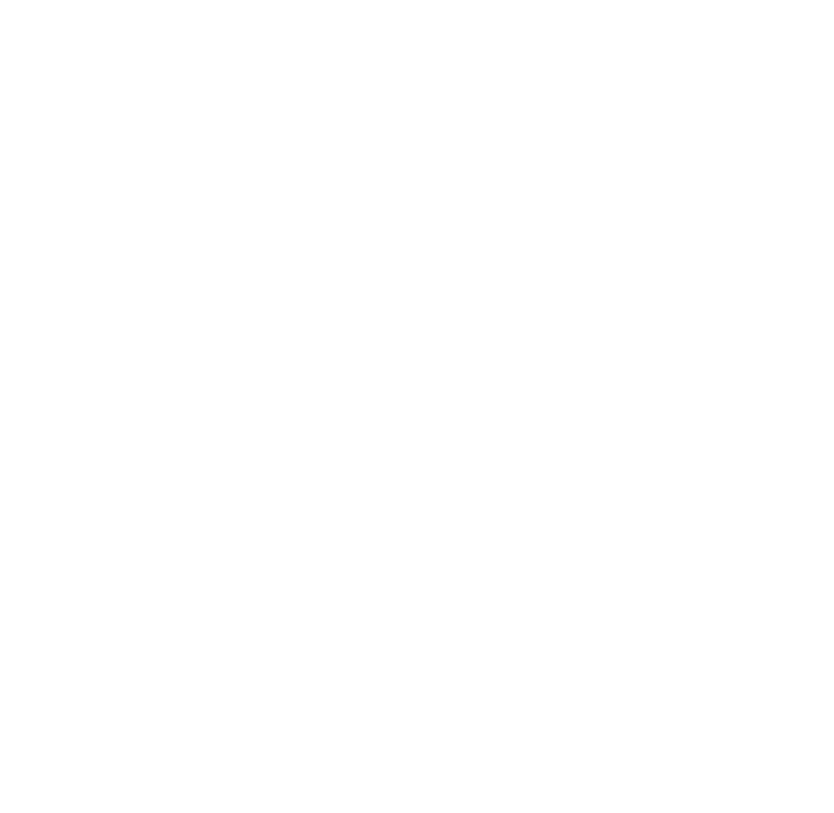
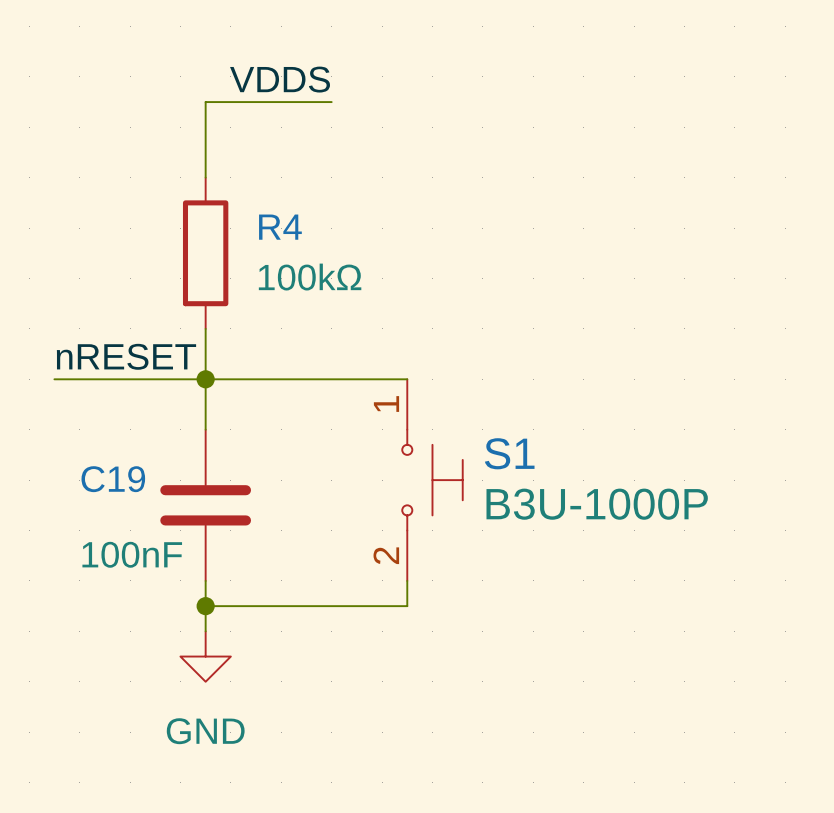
label: none -> VDDS (280, 79)
wire: none -> (331, 102) (205, 102) (205, 177)
R4: none -> 100kΩ (205, 253)
wire: none -> (205, 328) (205, 429)
label: none -> nRESET (126, 356)
wire: none -> (54, 379) (407, 379)
junction: none -> (205, 379)
S1: none -> B3U-1000P (432, 480)
C19: none -> 100nF (205, 505)
wire: none -> (205, 580) (205, 631)
wire: none -> (407, 580) (407, 606) (205, 606)
junction: none -> (205, 606)
power symbol: none -> GND (205, 656)

